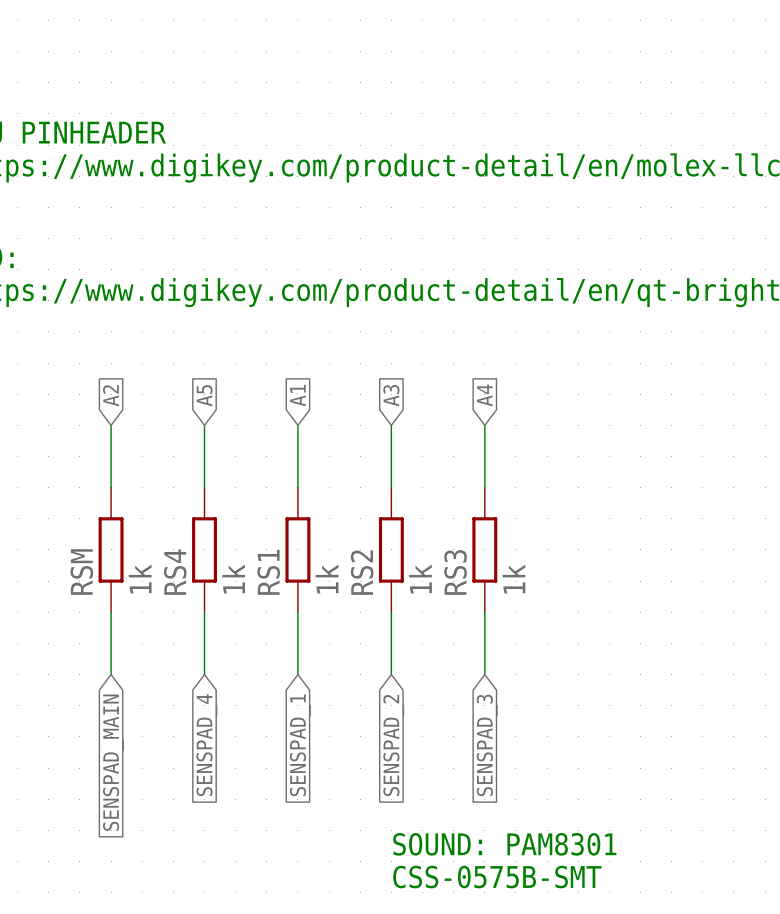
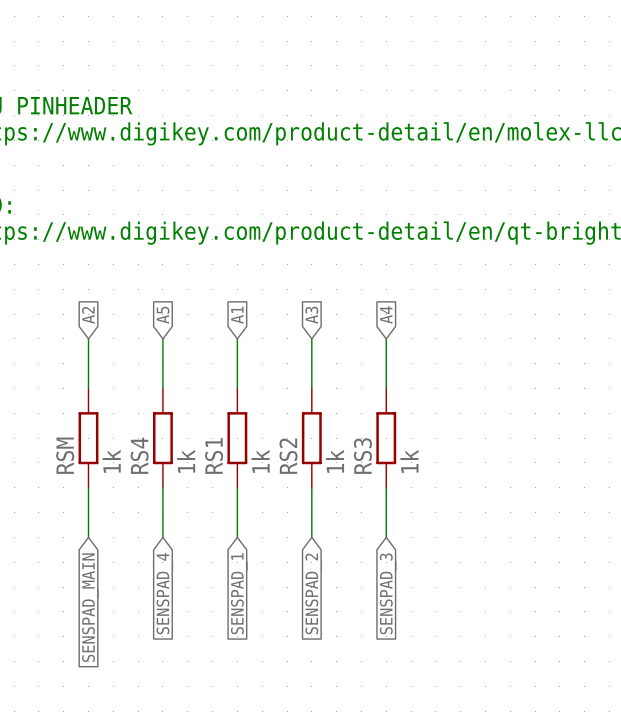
text: SOUND: PAM8301 (504, 844) -> none
text: CSS-0575B-SMT (497, 877) -> none

